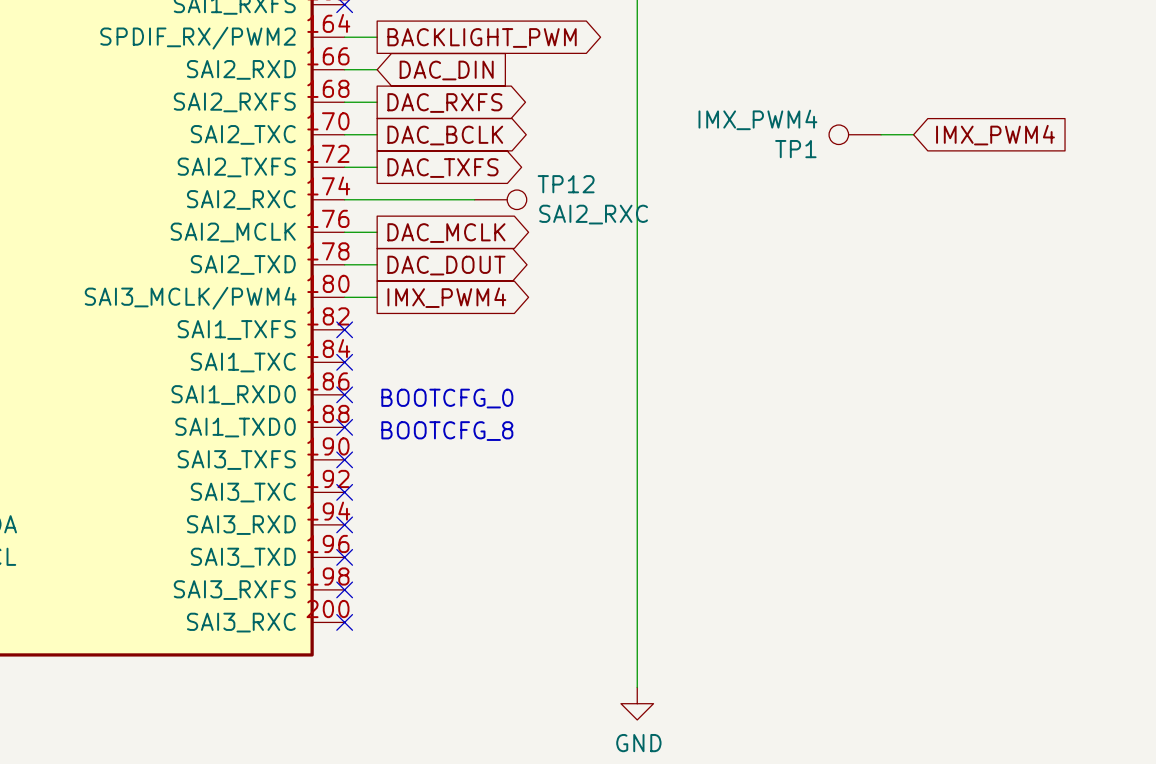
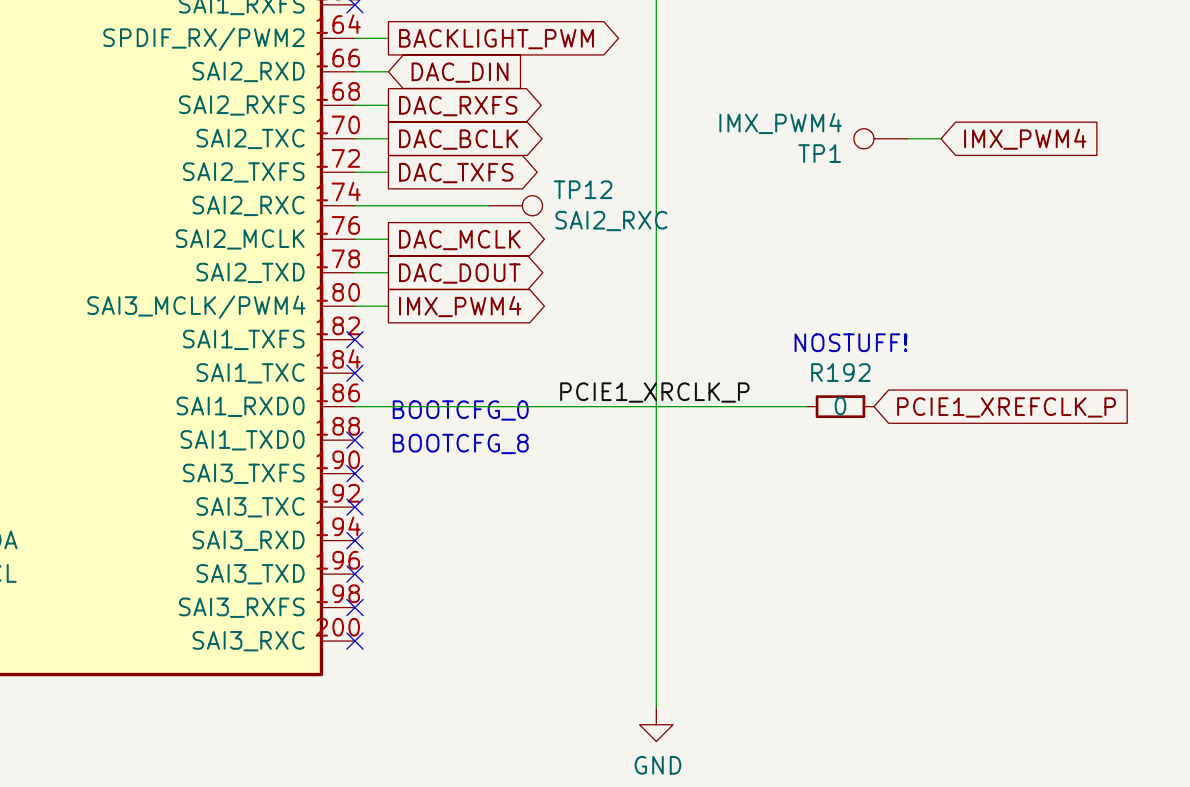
text: none -> NOSTUFF! (850, 342)
label: none -> PCIE1_XRCLK_P (654, 392)
wire: none -> (354, 406) (807, 406)
no-connect mark: (344, 394) -> none
R192: none -> 0 (840, 406)
global label: none -> PCIE1_XREFCLK_P (1006, 407)

